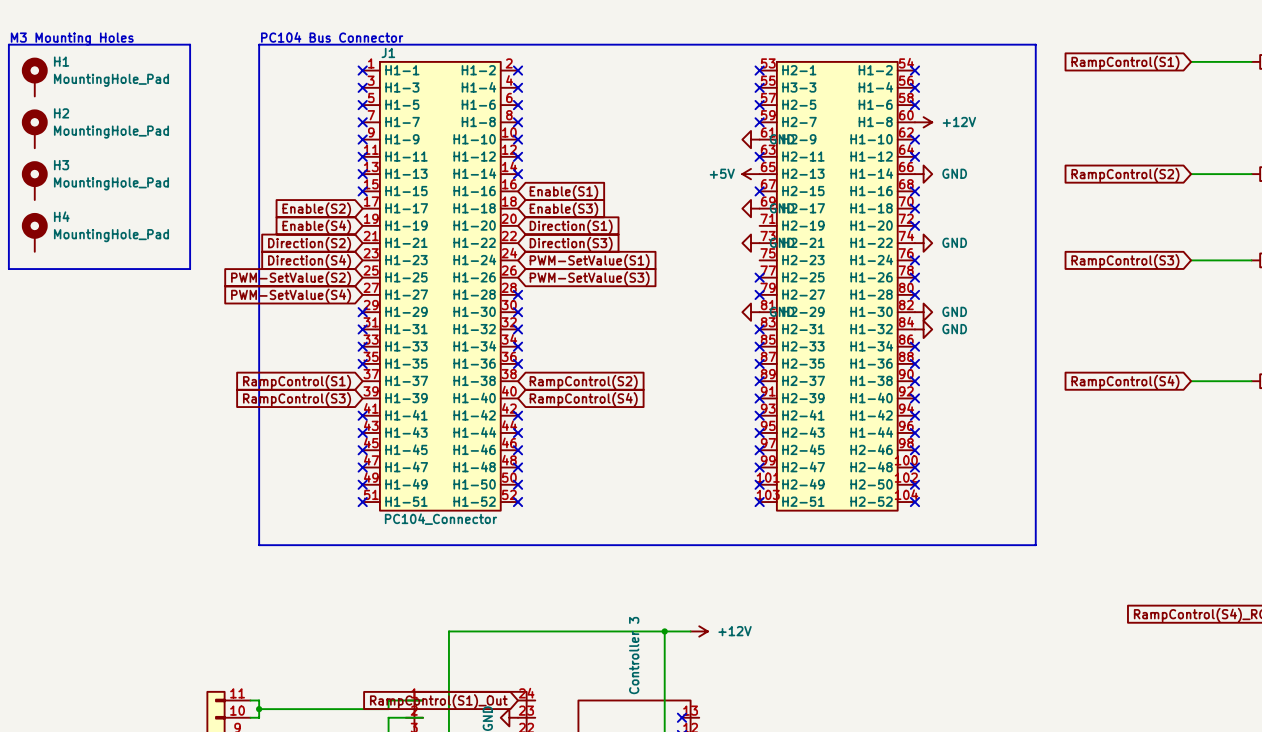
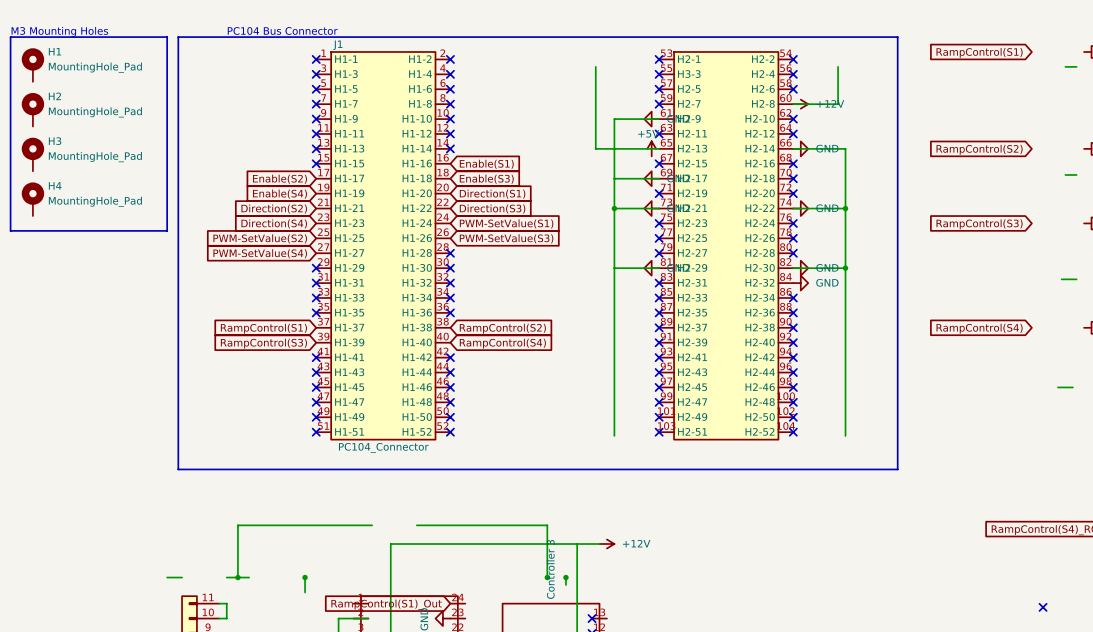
line: (259, 44) (259, 545) -> (226, 37) (178, 37) (178, 469) (226, 469)
J1 symbol: [362, 61, 915, 511] -> [316, 51, 794, 440]
wire: (1191, 61) (1251, 61) -> none
wire: none -> (595, 66) (595, 148) (659, 148)
wire: none -> (838, 66) (838, 104) (793, 104)
wire: none -> (1065, 66) (1076, 66)
wire: none -> (659, 119) (614, 119) (614, 435)
power symbol rotation: 0° (751, 174) -> 90° clockwise (651, 148)
wire: none -> (793, 148) (845, 148) (845, 435)
wire: (1191, 174) (1251, 174) -> none
wire: none -> (1065, 174) (1076, 174)
wire: none -> (614, 178) (659, 178)
no-connect mark: none -> (659, 193)
wire: none -> (614, 208) (659, 208)
junction: none -> (614, 208)
wire: none -> (793, 208) (845, 208)
junction: none -> (845, 208)
no-connect mark: none -> (659, 223)
wire: (1191, 260) (1251, 260) -> none
wire: none -> (614, 268) (659, 268)
wire: none -> (793, 268) (845, 268)
junction: none -> (845, 268)
wire: none -> (1061, 279) (1076, 279)
wire: (1191, 381) (1251, 381) -> none
wire: none -> (1057, 387) (1072, 387)
wire: none -> (372, 525) (237, 525) (237, 577)
wire: none -> (416, 525) (547, 525) (547, 577)
junction: (664, 631) -> none
wire: none -> (167, 577) (182, 577)
wire: none -> (226, 577) (249, 577)
junction: none -> (237, 577)
wire: none -> (305, 577) (305, 592)
junction: none -> (305, 577)
junction: none -> (547, 577)
wire: none -> (565, 577) (565, 585)
junction: none -> (565, 577)
wire: (423, 700) (388, 700) (388, 709) (259, 709) -> none
no-connect mark: none -> (1043, 607)
junction: (259, 709) -> none

